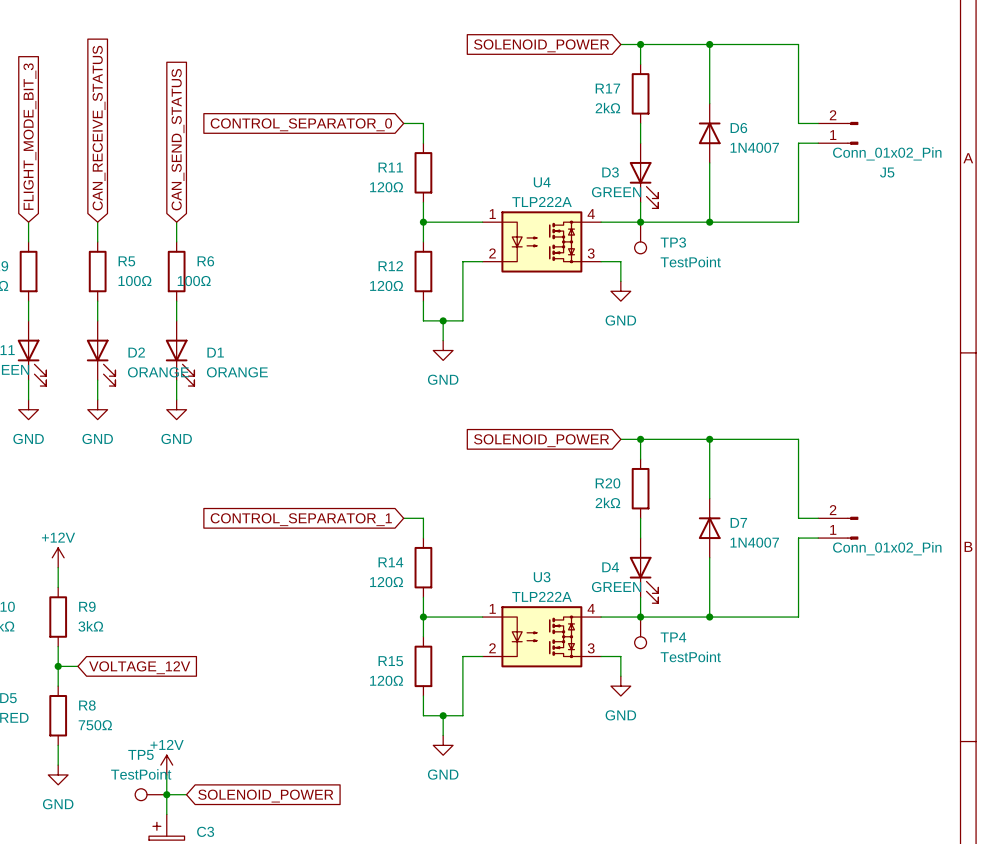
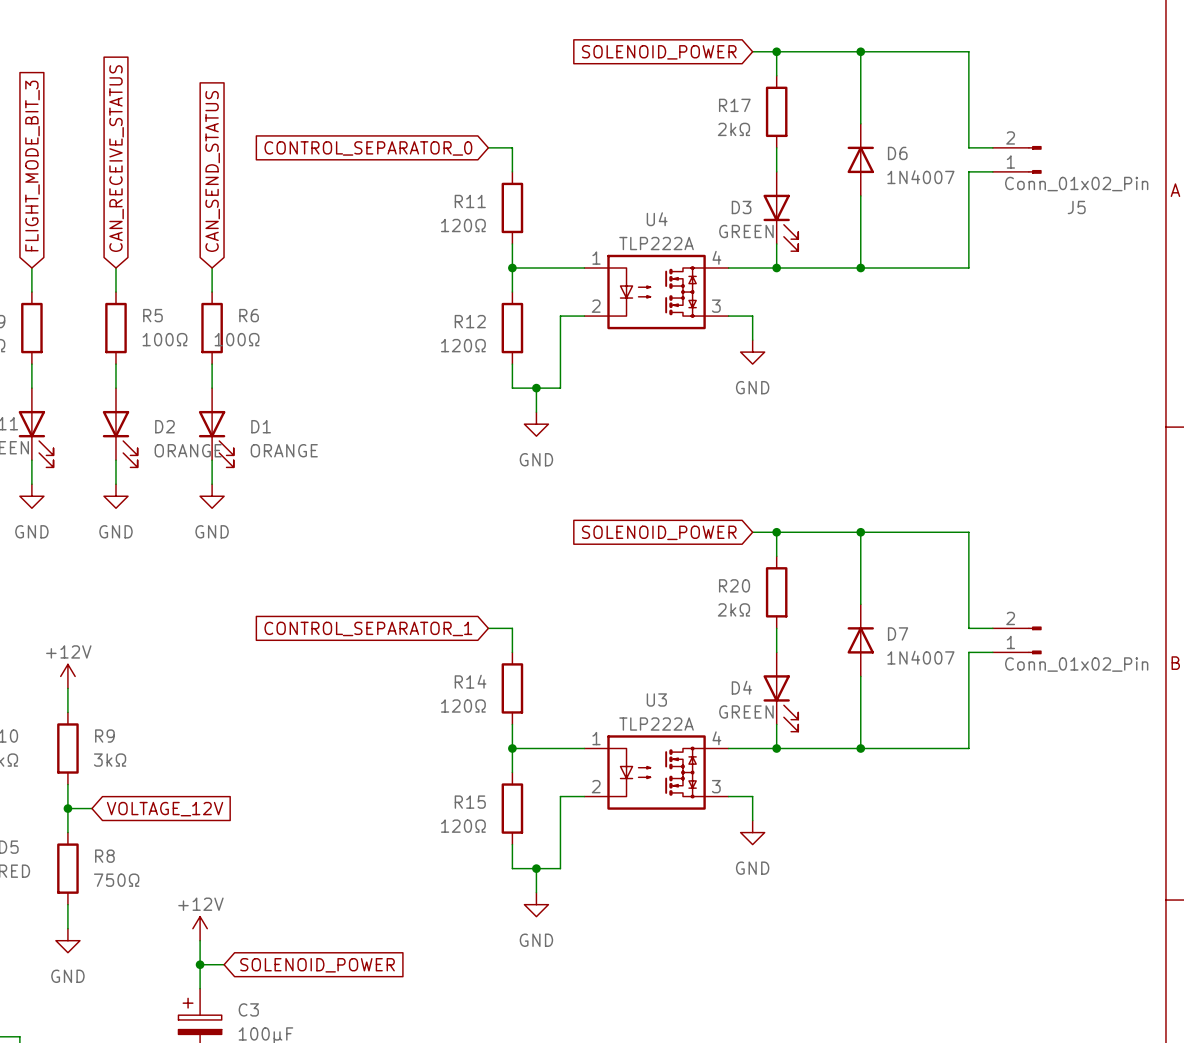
TP3: TestPoint (640, 237) -> none
TP4: TestPoint (640, 632) -> none
TP5: TestPoint (150, 794) -> none

